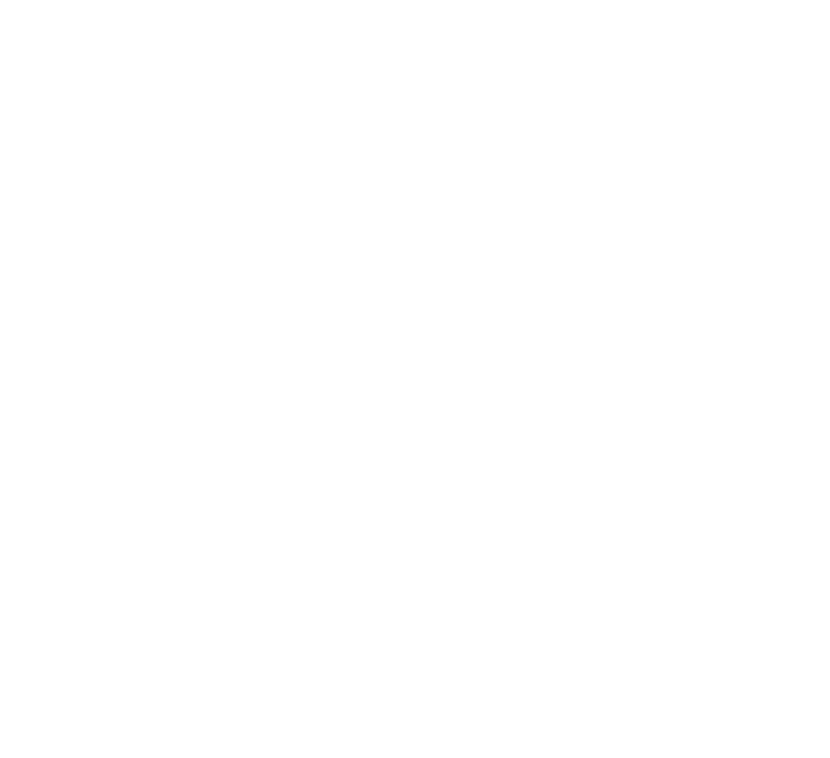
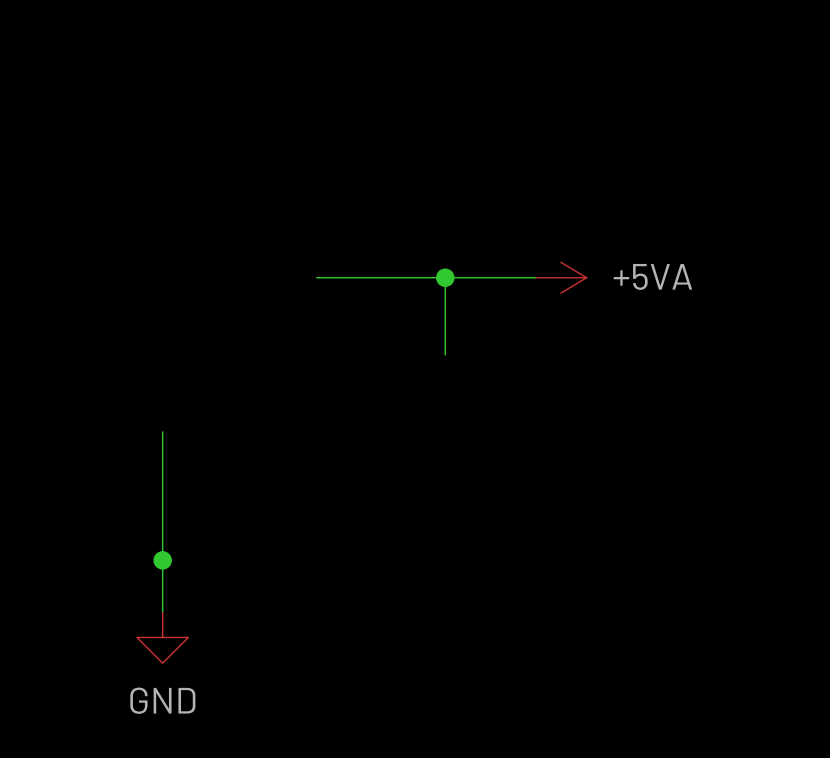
wire: none -> (316, 277) (535, 277)
wire: none -> (445, 277) (445, 354)
junction: none -> (445, 277)
power symbol: none -> +5VA (560, 277)
wire: none -> (162, 431) (162, 611)
junction: none -> (162, 560)
power symbol: none -> GND (162, 637)

